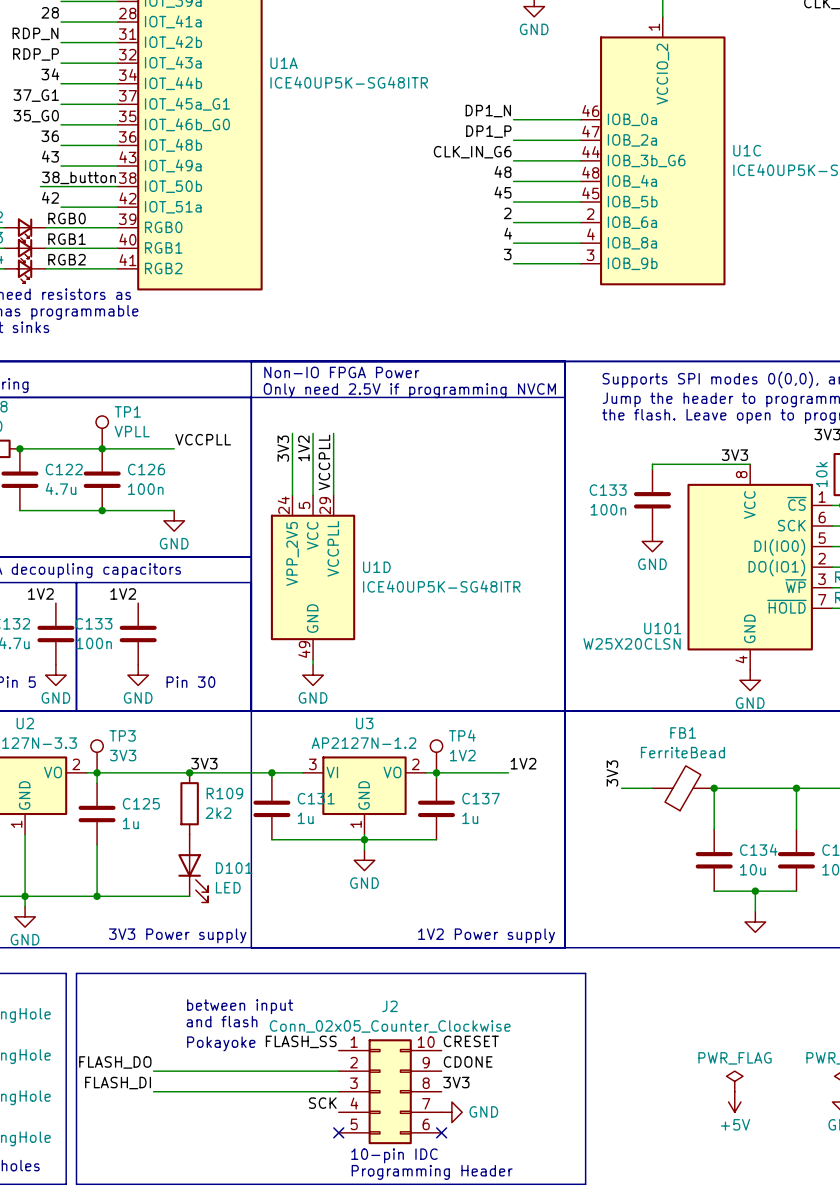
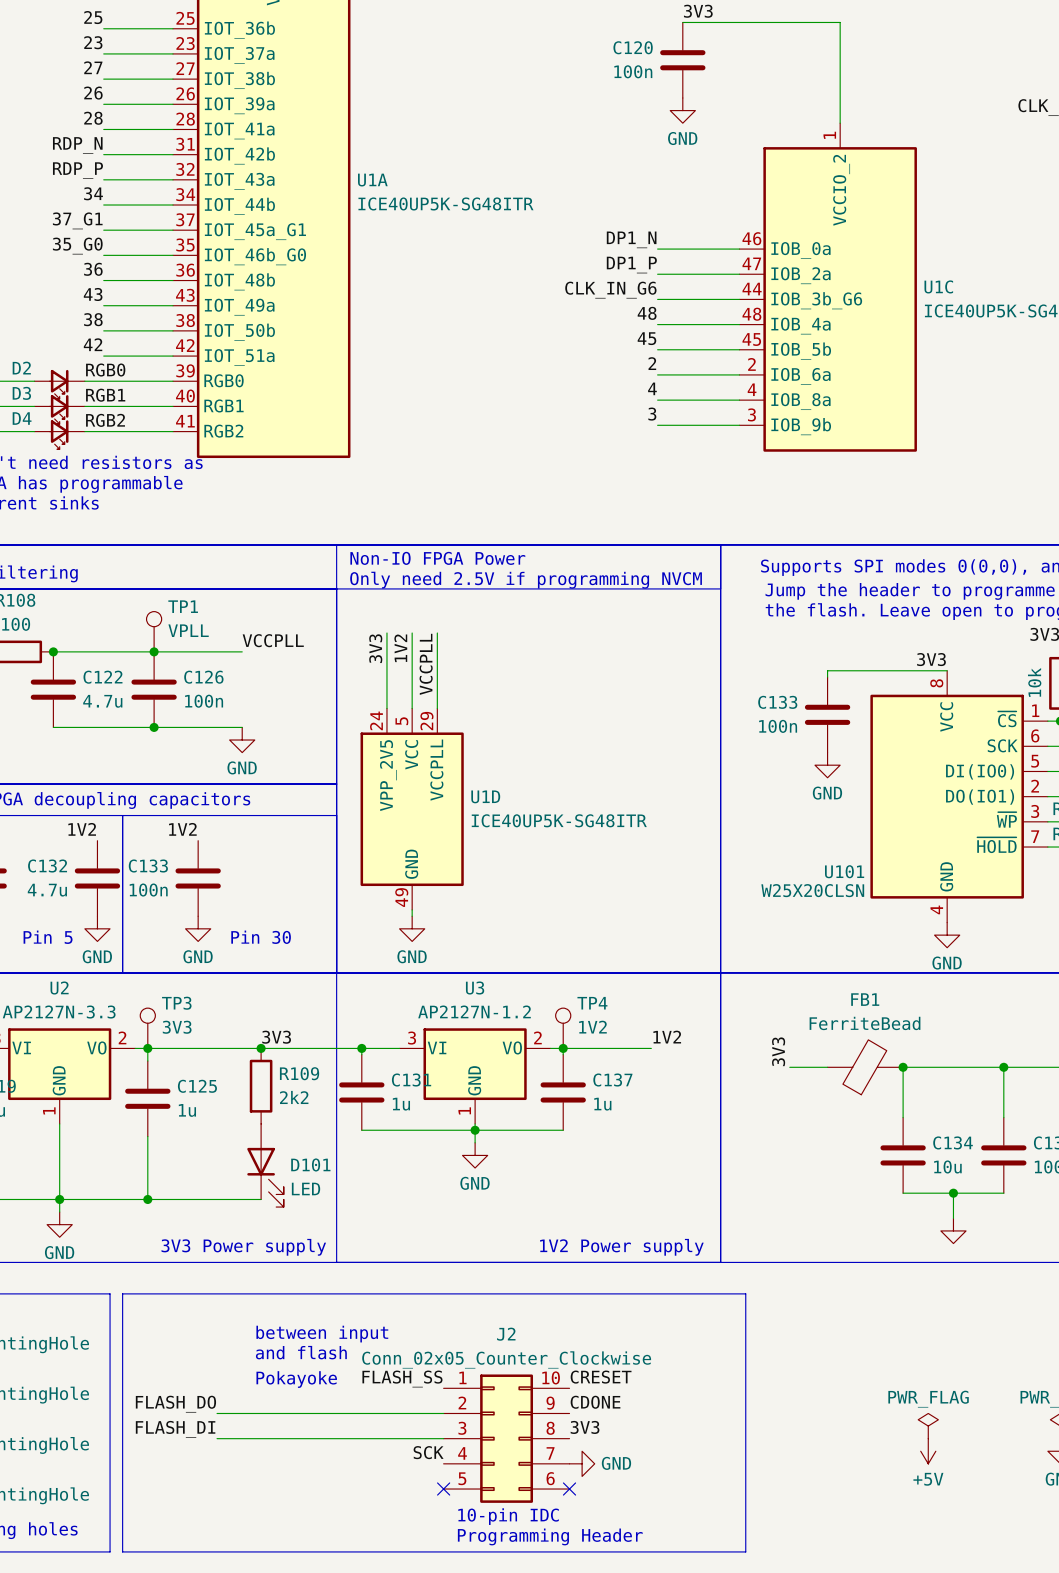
label: none -> 38 (93, 319)
label: 38_button (79, 177) -> none
wire: (40, 186) (61, 186) -> none

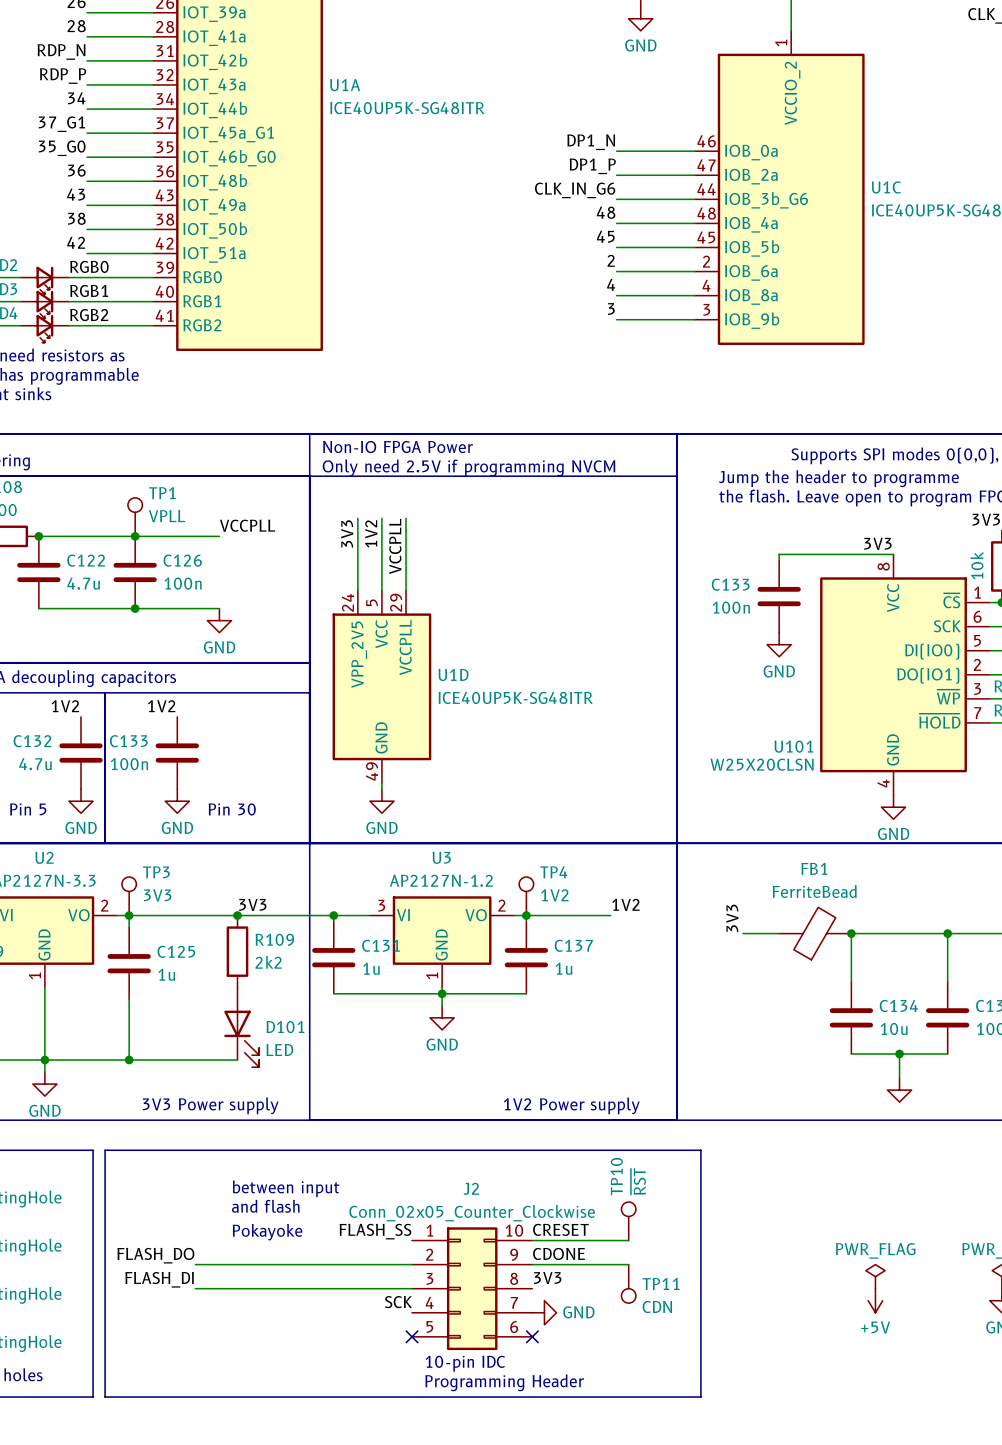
TP10: none -> ~{RST} (628, 1221)
wire: none -> (532, 1240) (628, 1240)
wire: none -> (532, 1264) (628, 1264)
TP11: none -> CDN (628, 1283)

